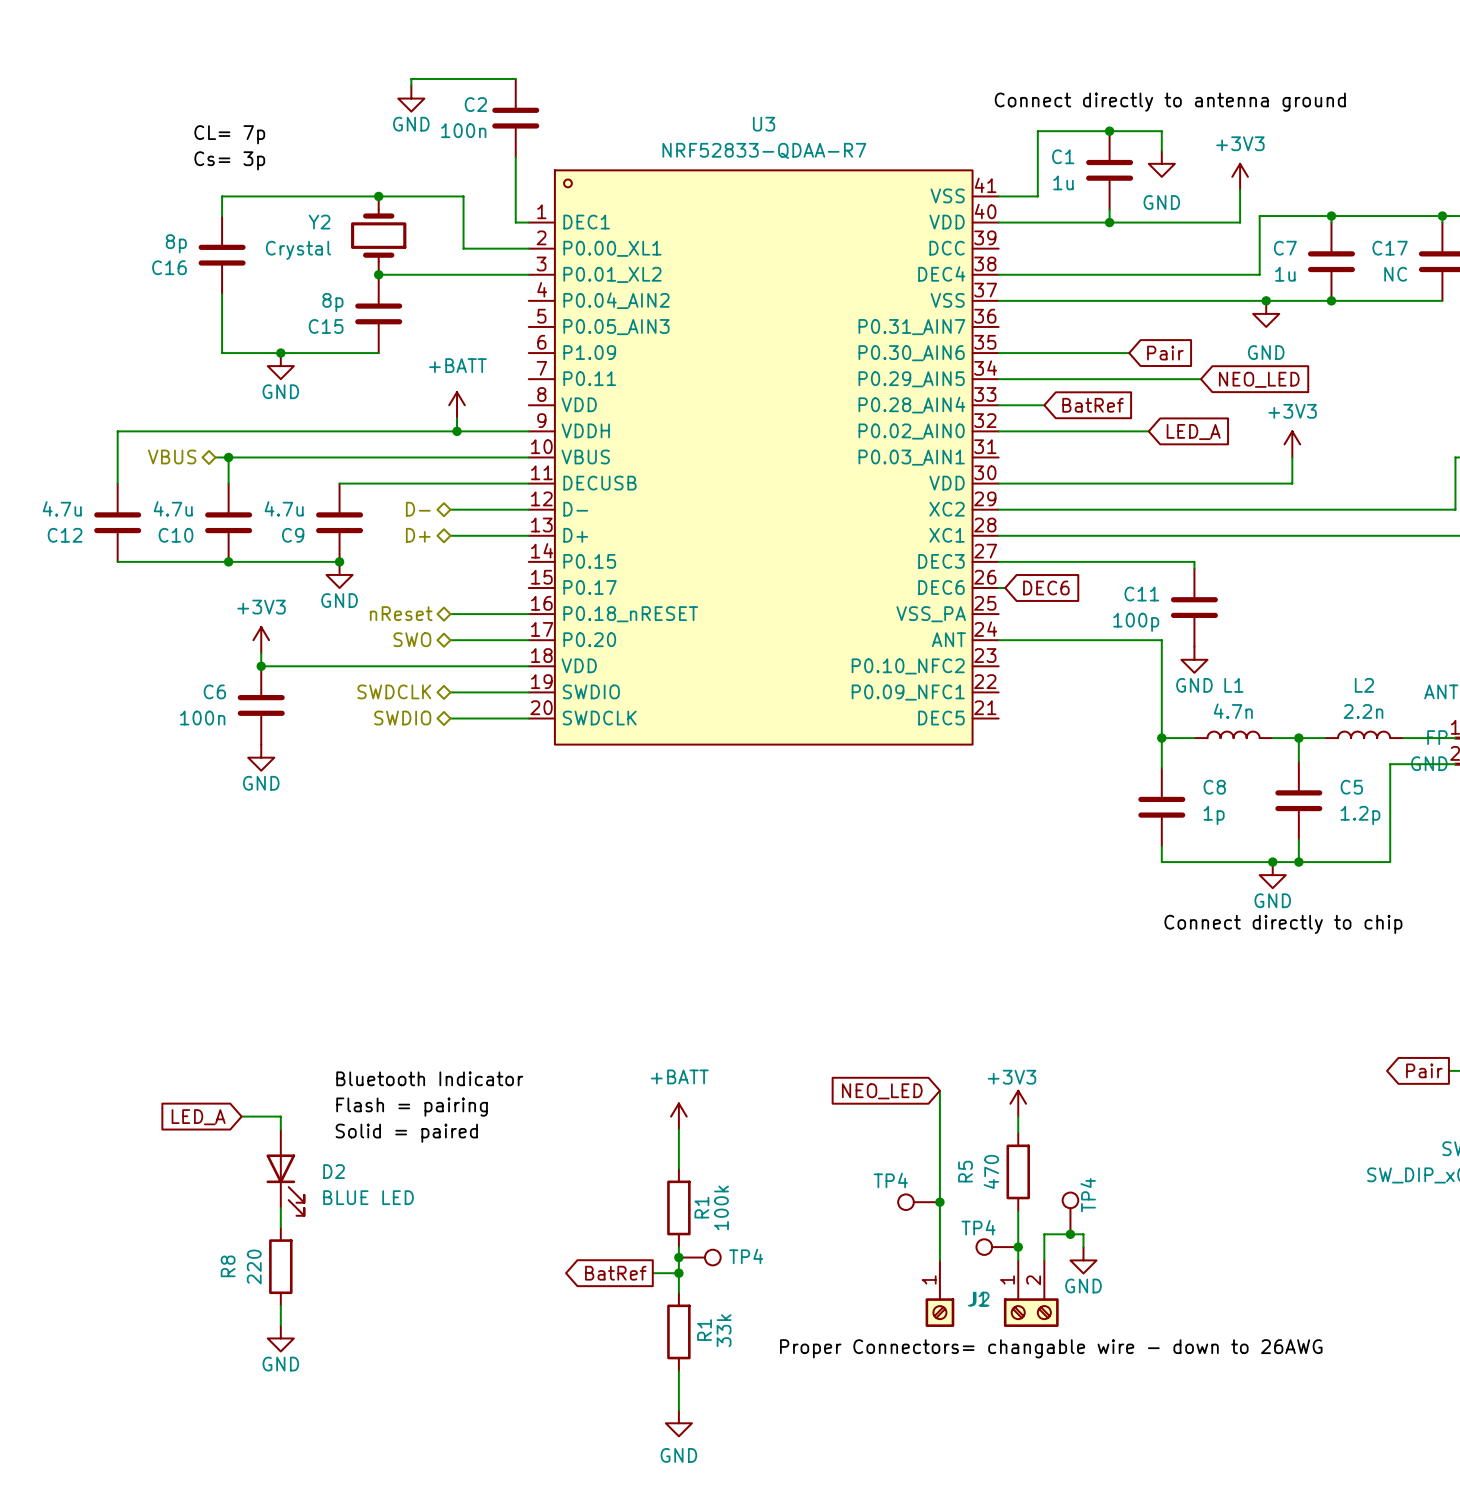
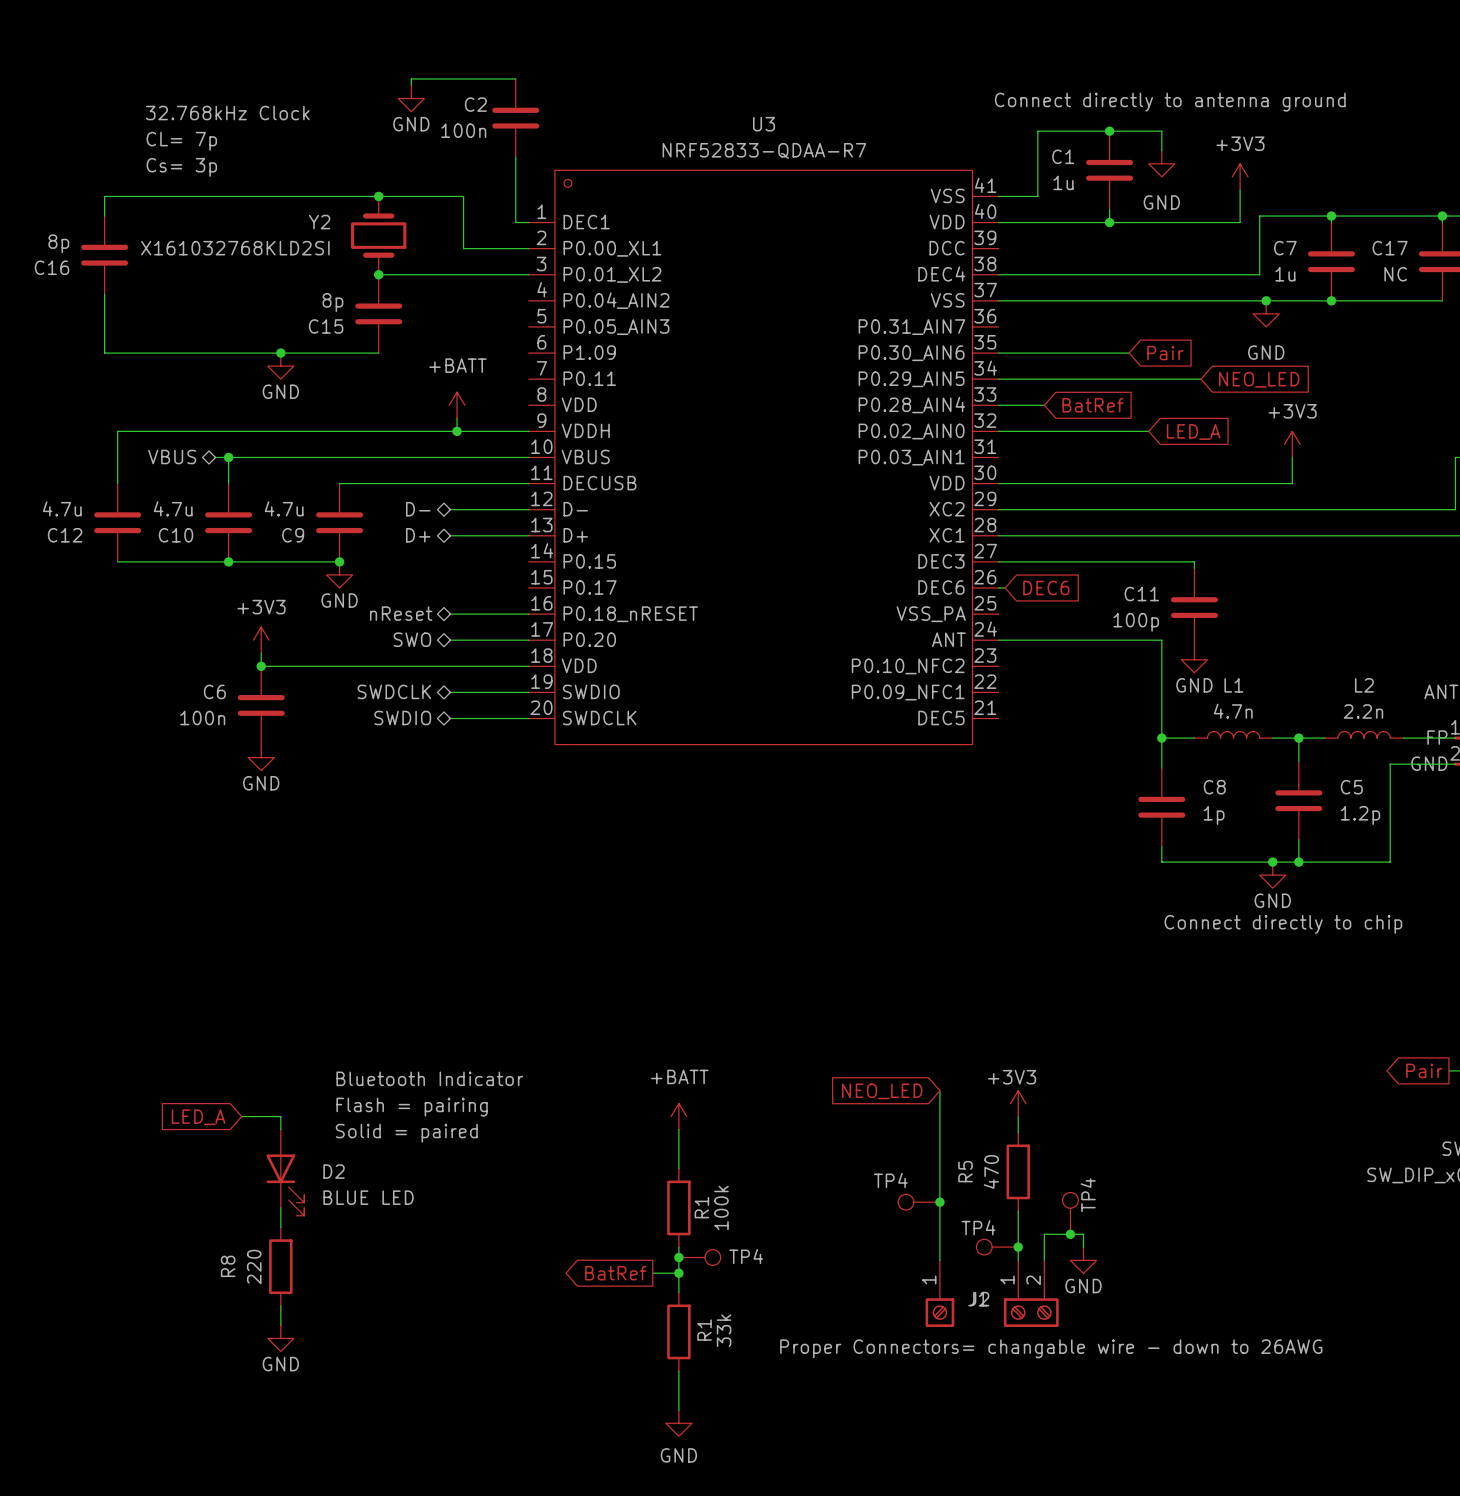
label: none -> 32.768kHz Clock (227, 113)
label position: CL= 7p (229, 134) -> CL= 7p (181, 141)
label position: Cs= 3p (229, 160) -> Cs= 3p (181, 167)
wire: (222, 196) (222, 216) -> (222, 196) (104, 196) (104, 216)
Y2 value: Crystal (298, 250) -> X161032768KLD2SI (235, 248)
C16 position: (222, 255) -> (104, 255)
wire: (222, 294) (222, 353) -> (104, 294) (104, 353) (222, 353)

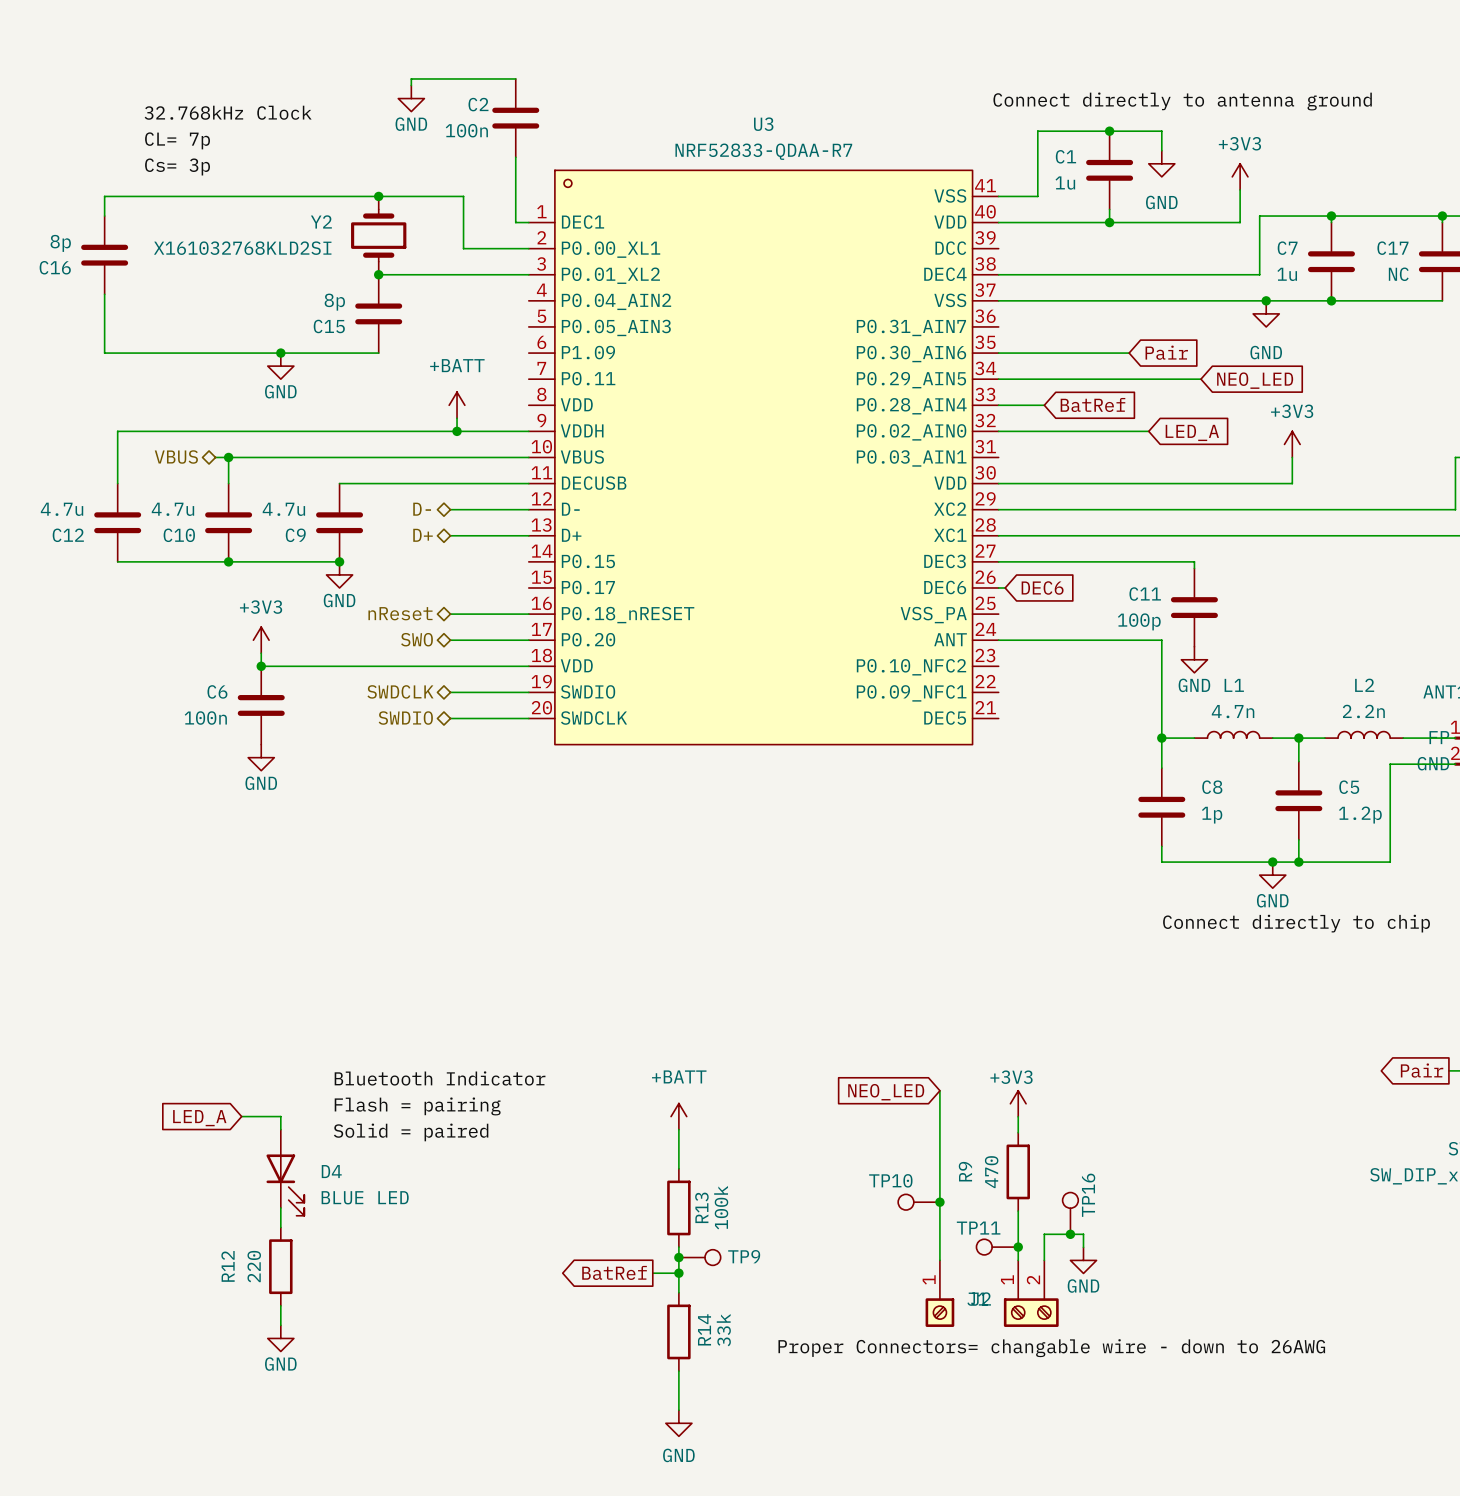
D2 name: D2 (334, 1171) -> D4 (331, 1171)
R5 name: R5 (965, 1171) -> R9 (965, 1171)
TP4 name: TP4 (890, 1180) -> TP10 (890, 1180)
TP4 name: TP4 (1088, 1195) -> TP16 (1088, 1195)
R1 name: R1 (701, 1207) -> R13 (701, 1207)
TP4 name: TP4 (978, 1227) -> TP11 (978, 1228)
TP4 name: TP4 (746, 1256) -> TP9 (744, 1256)
R8 name: R8 (228, 1266) -> R12 (228, 1266)
R1 name: R1 (704, 1330) -> R14 (704, 1329)

